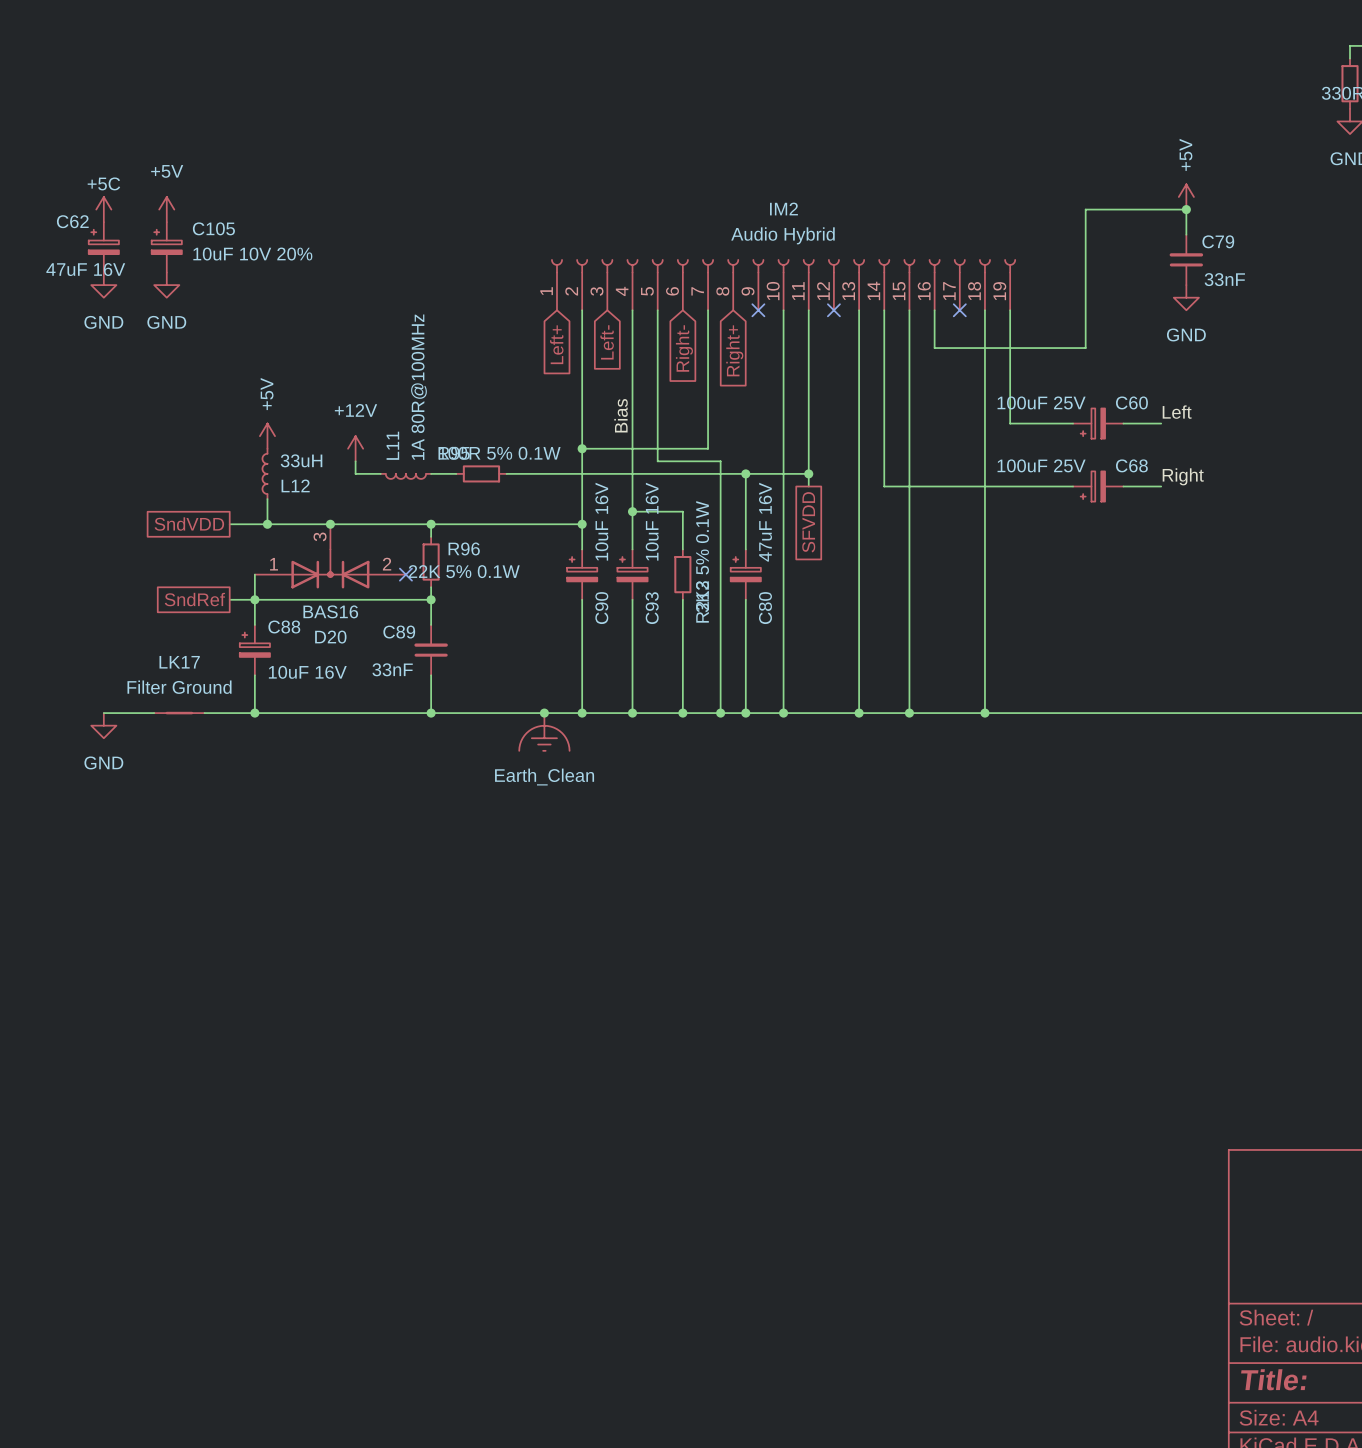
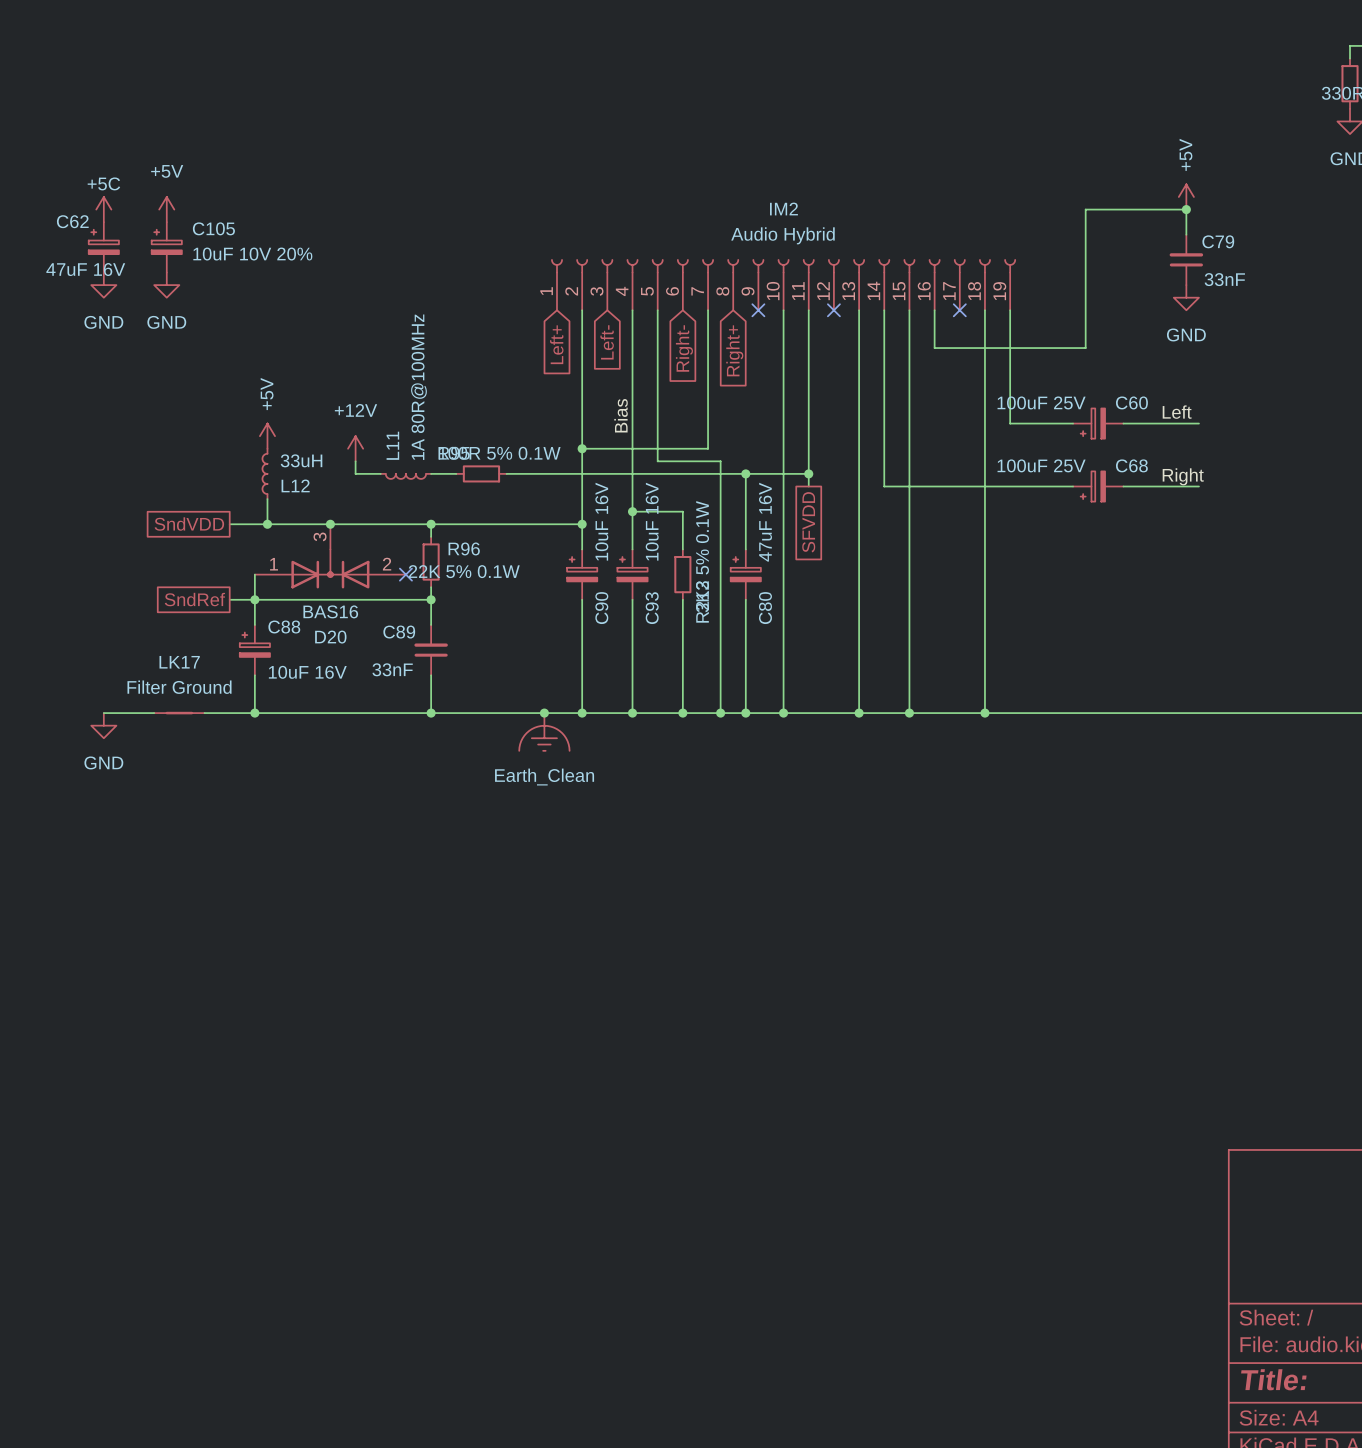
wire: none -> (1161, 423) (1198, 423)
wire: none -> (1161, 486) (1198, 486)

